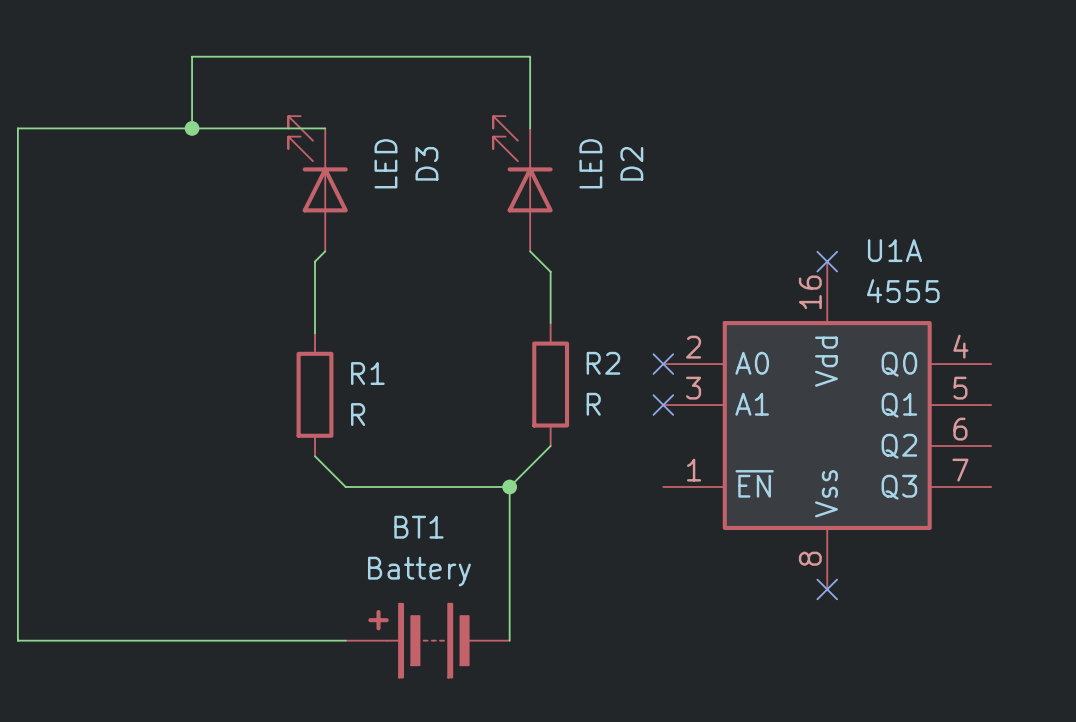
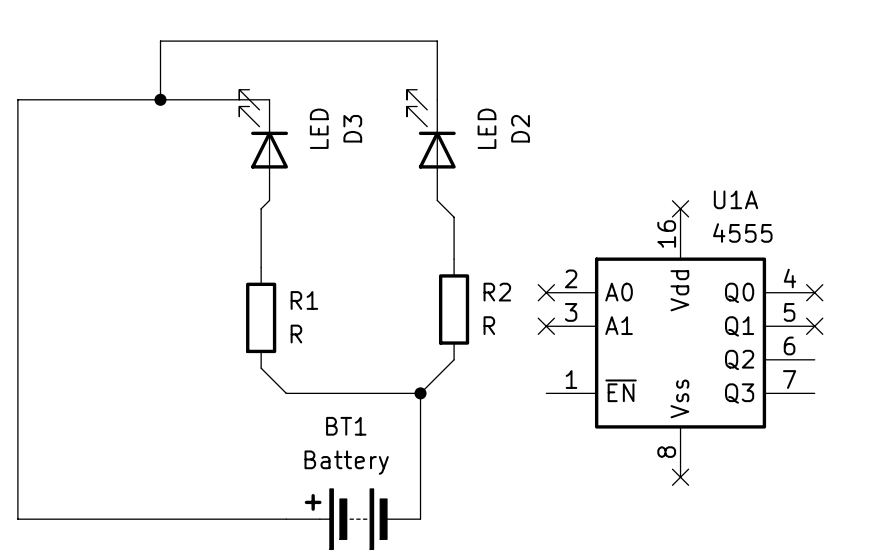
no-connect mark: none -> (814, 292)
no-connect mark: none -> (814, 326)

